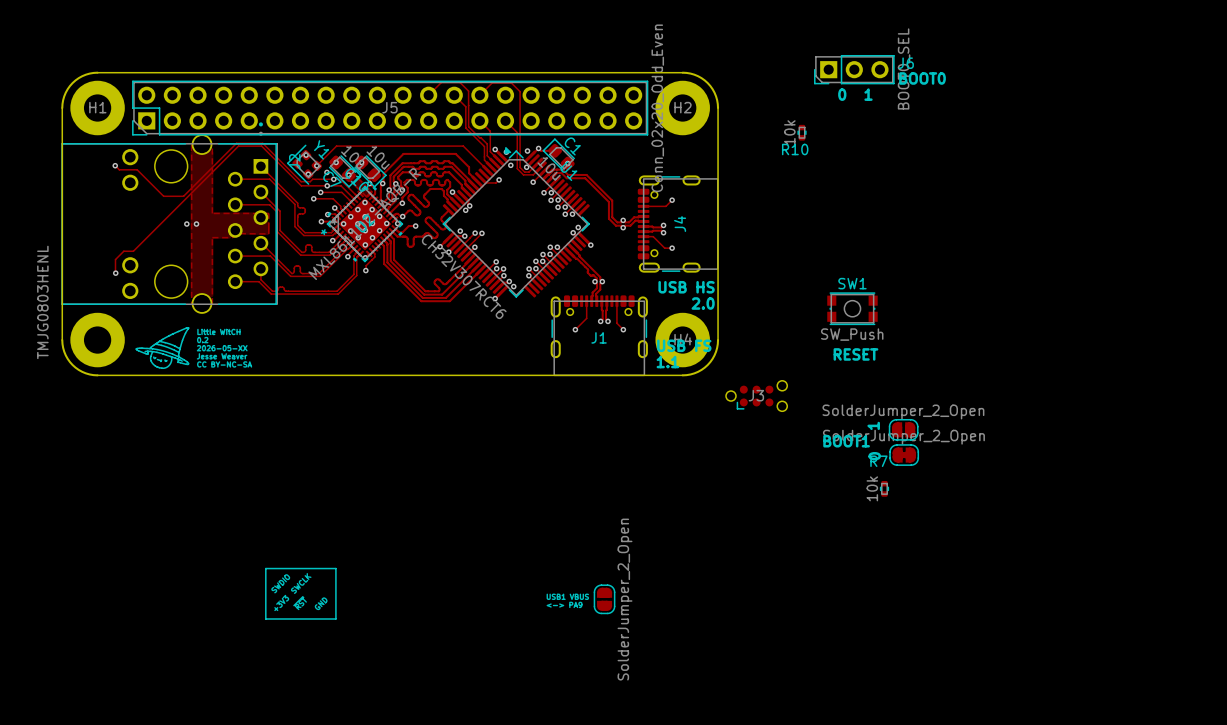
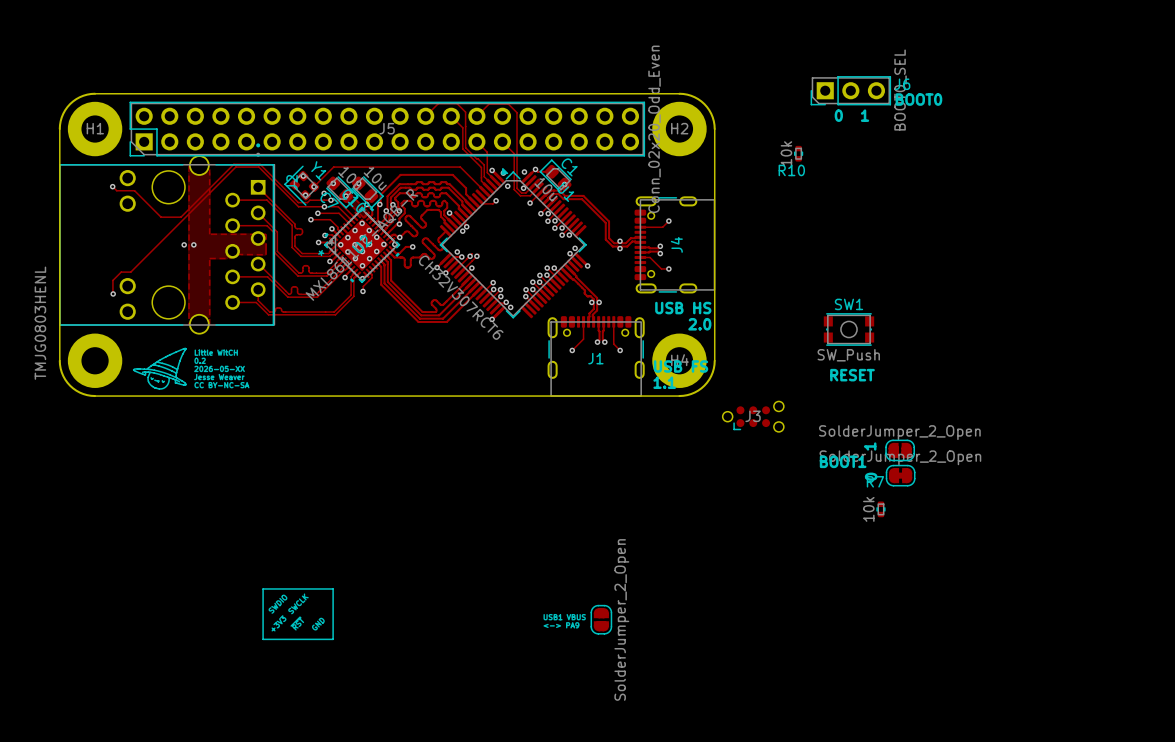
via: (475, 233) -> none
via: (481, 233) -> none
via: none -> (470, 256)
via: none -> (476, 256)

